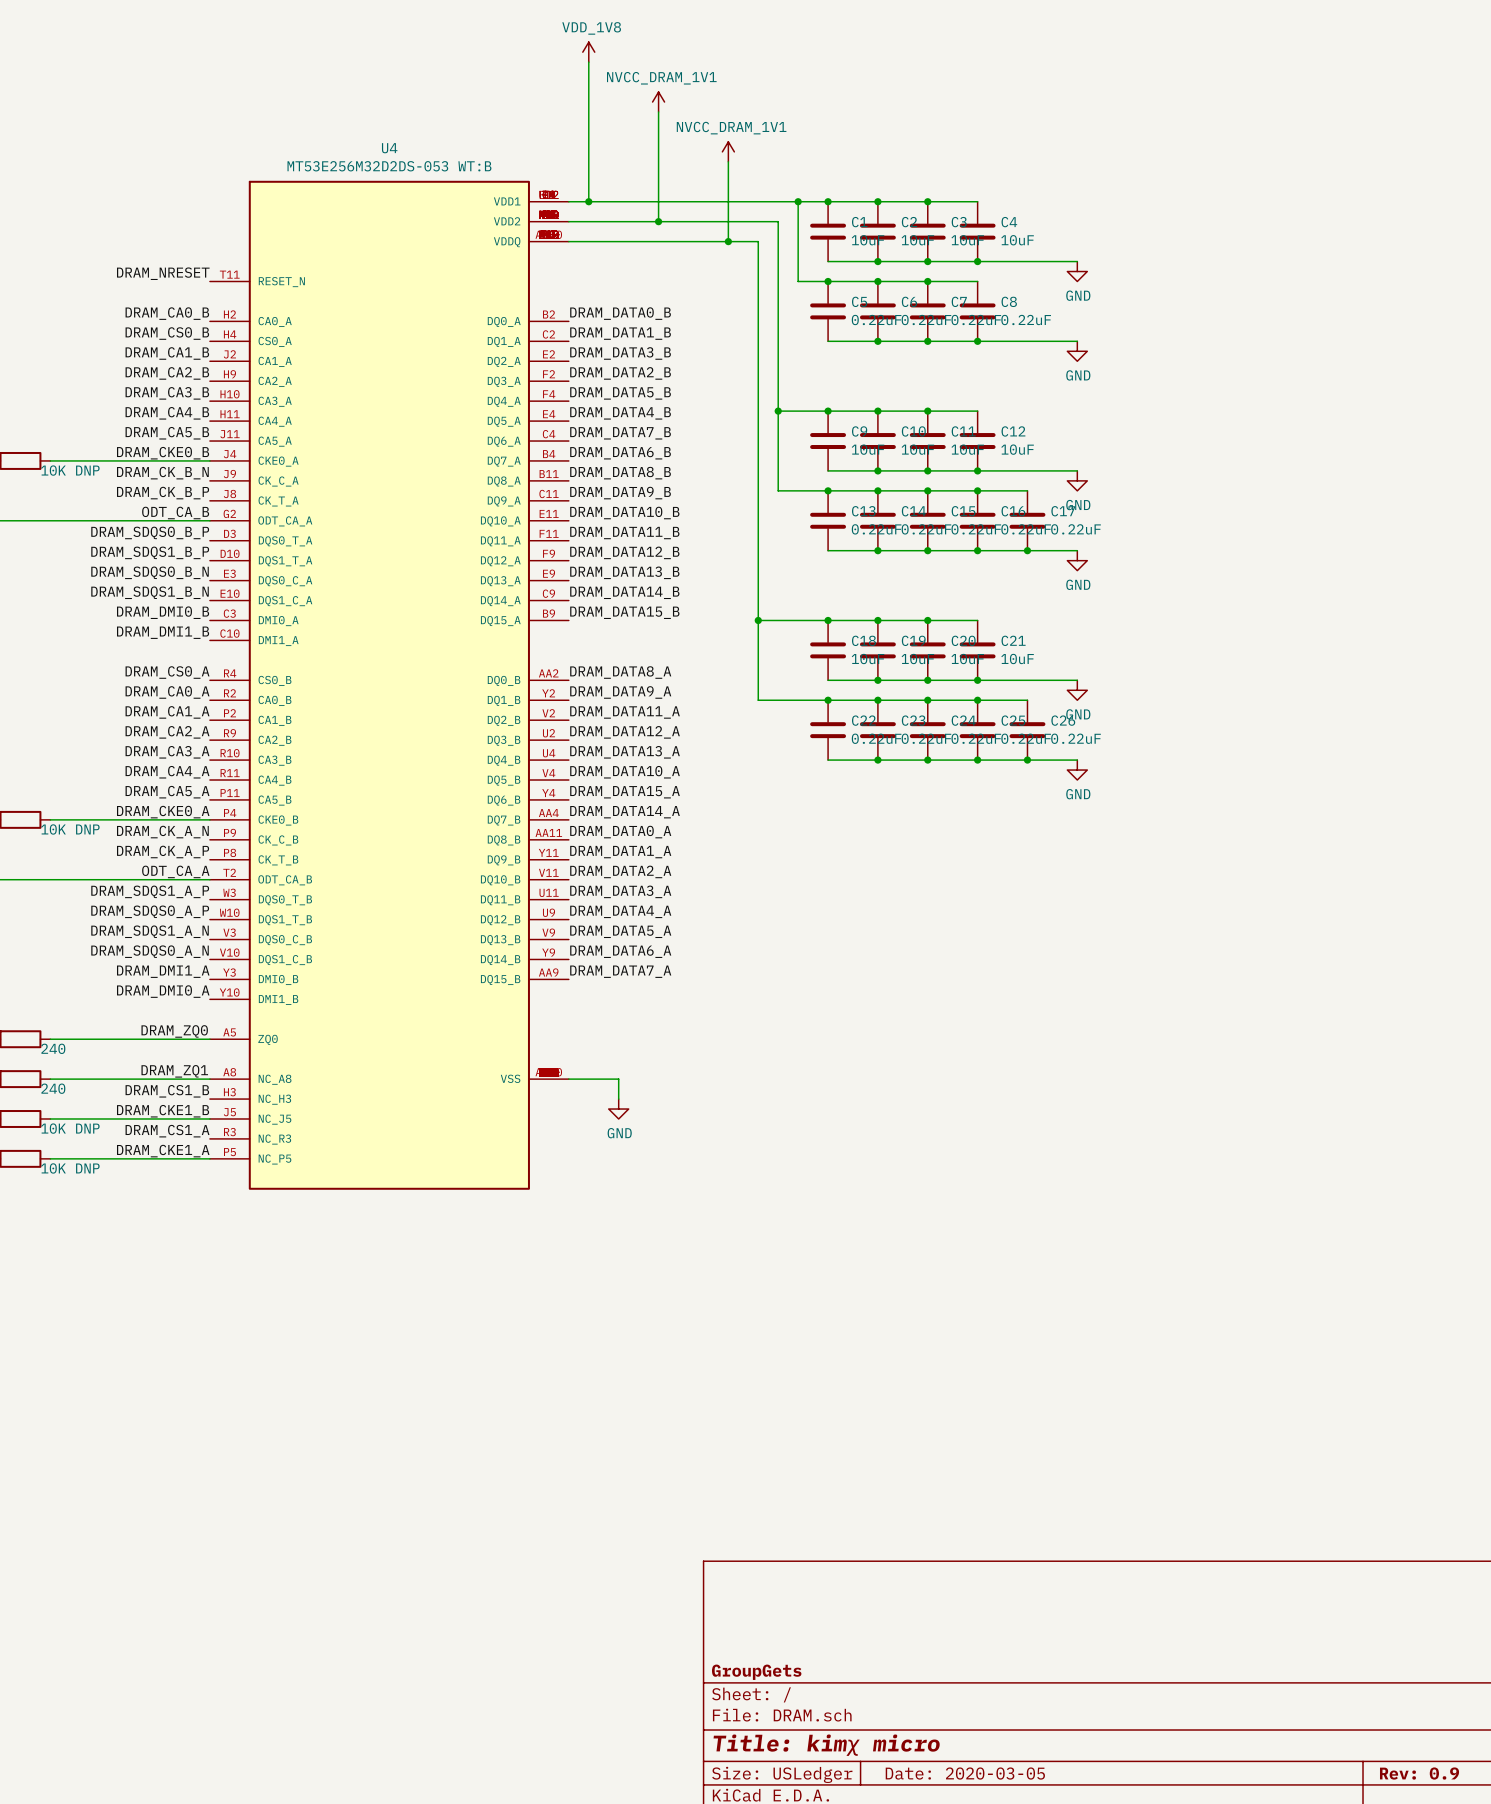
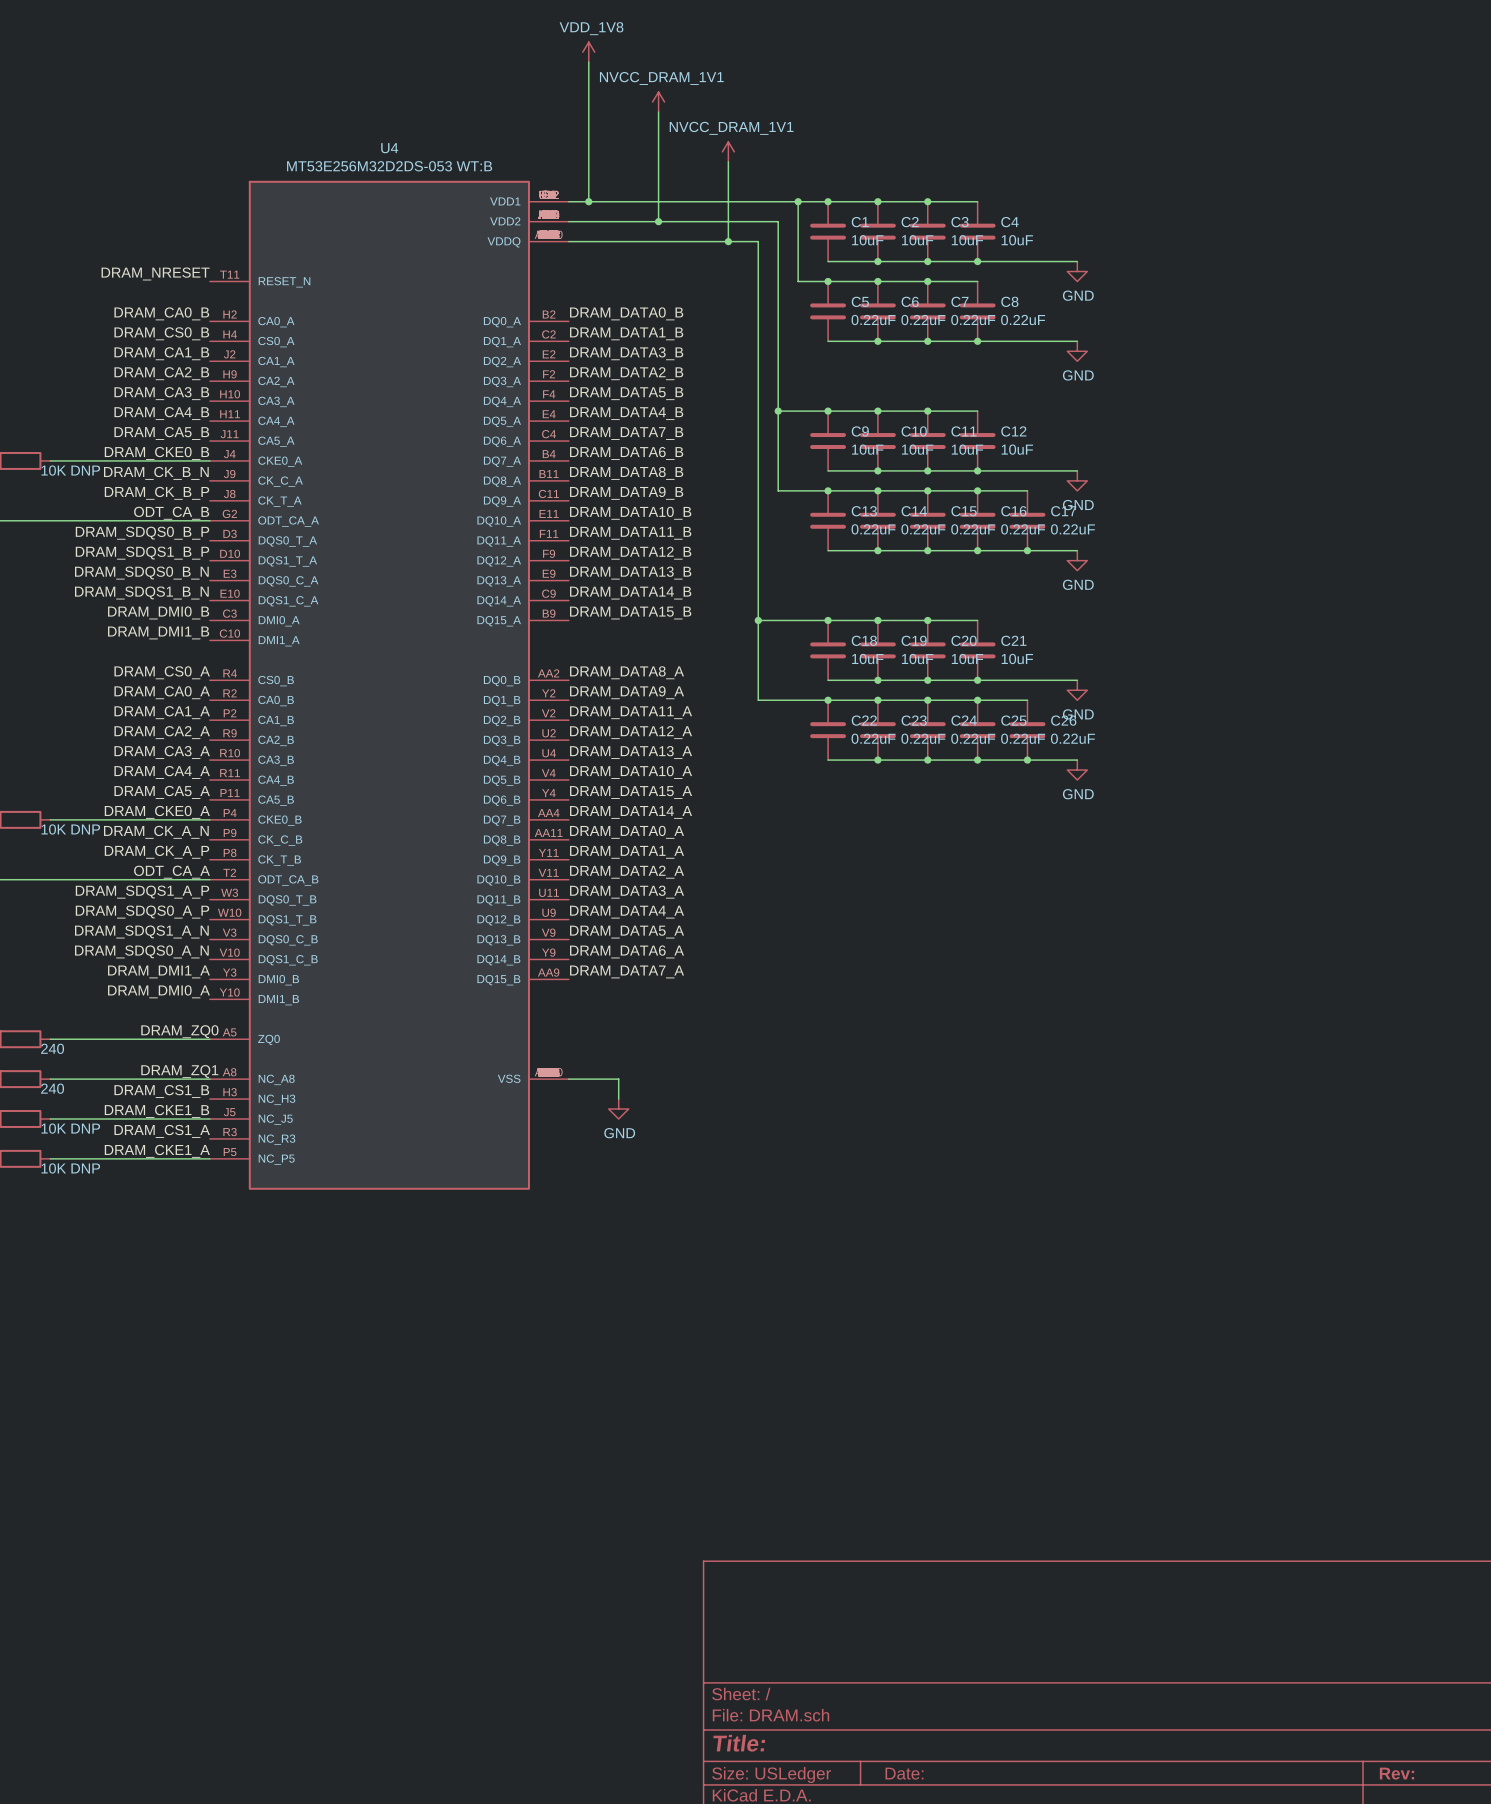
title block: GroupGets (756, 1672) -> none
title block: Title: kimχ micro (826, 1745) -> Title: (739, 1743)
title block: Date: 2020-03-05 (965, 1773) -> Date: (904, 1773)
title block: Rev: 0.9 (1419, 1773) -> Rev: (1397, 1773)

